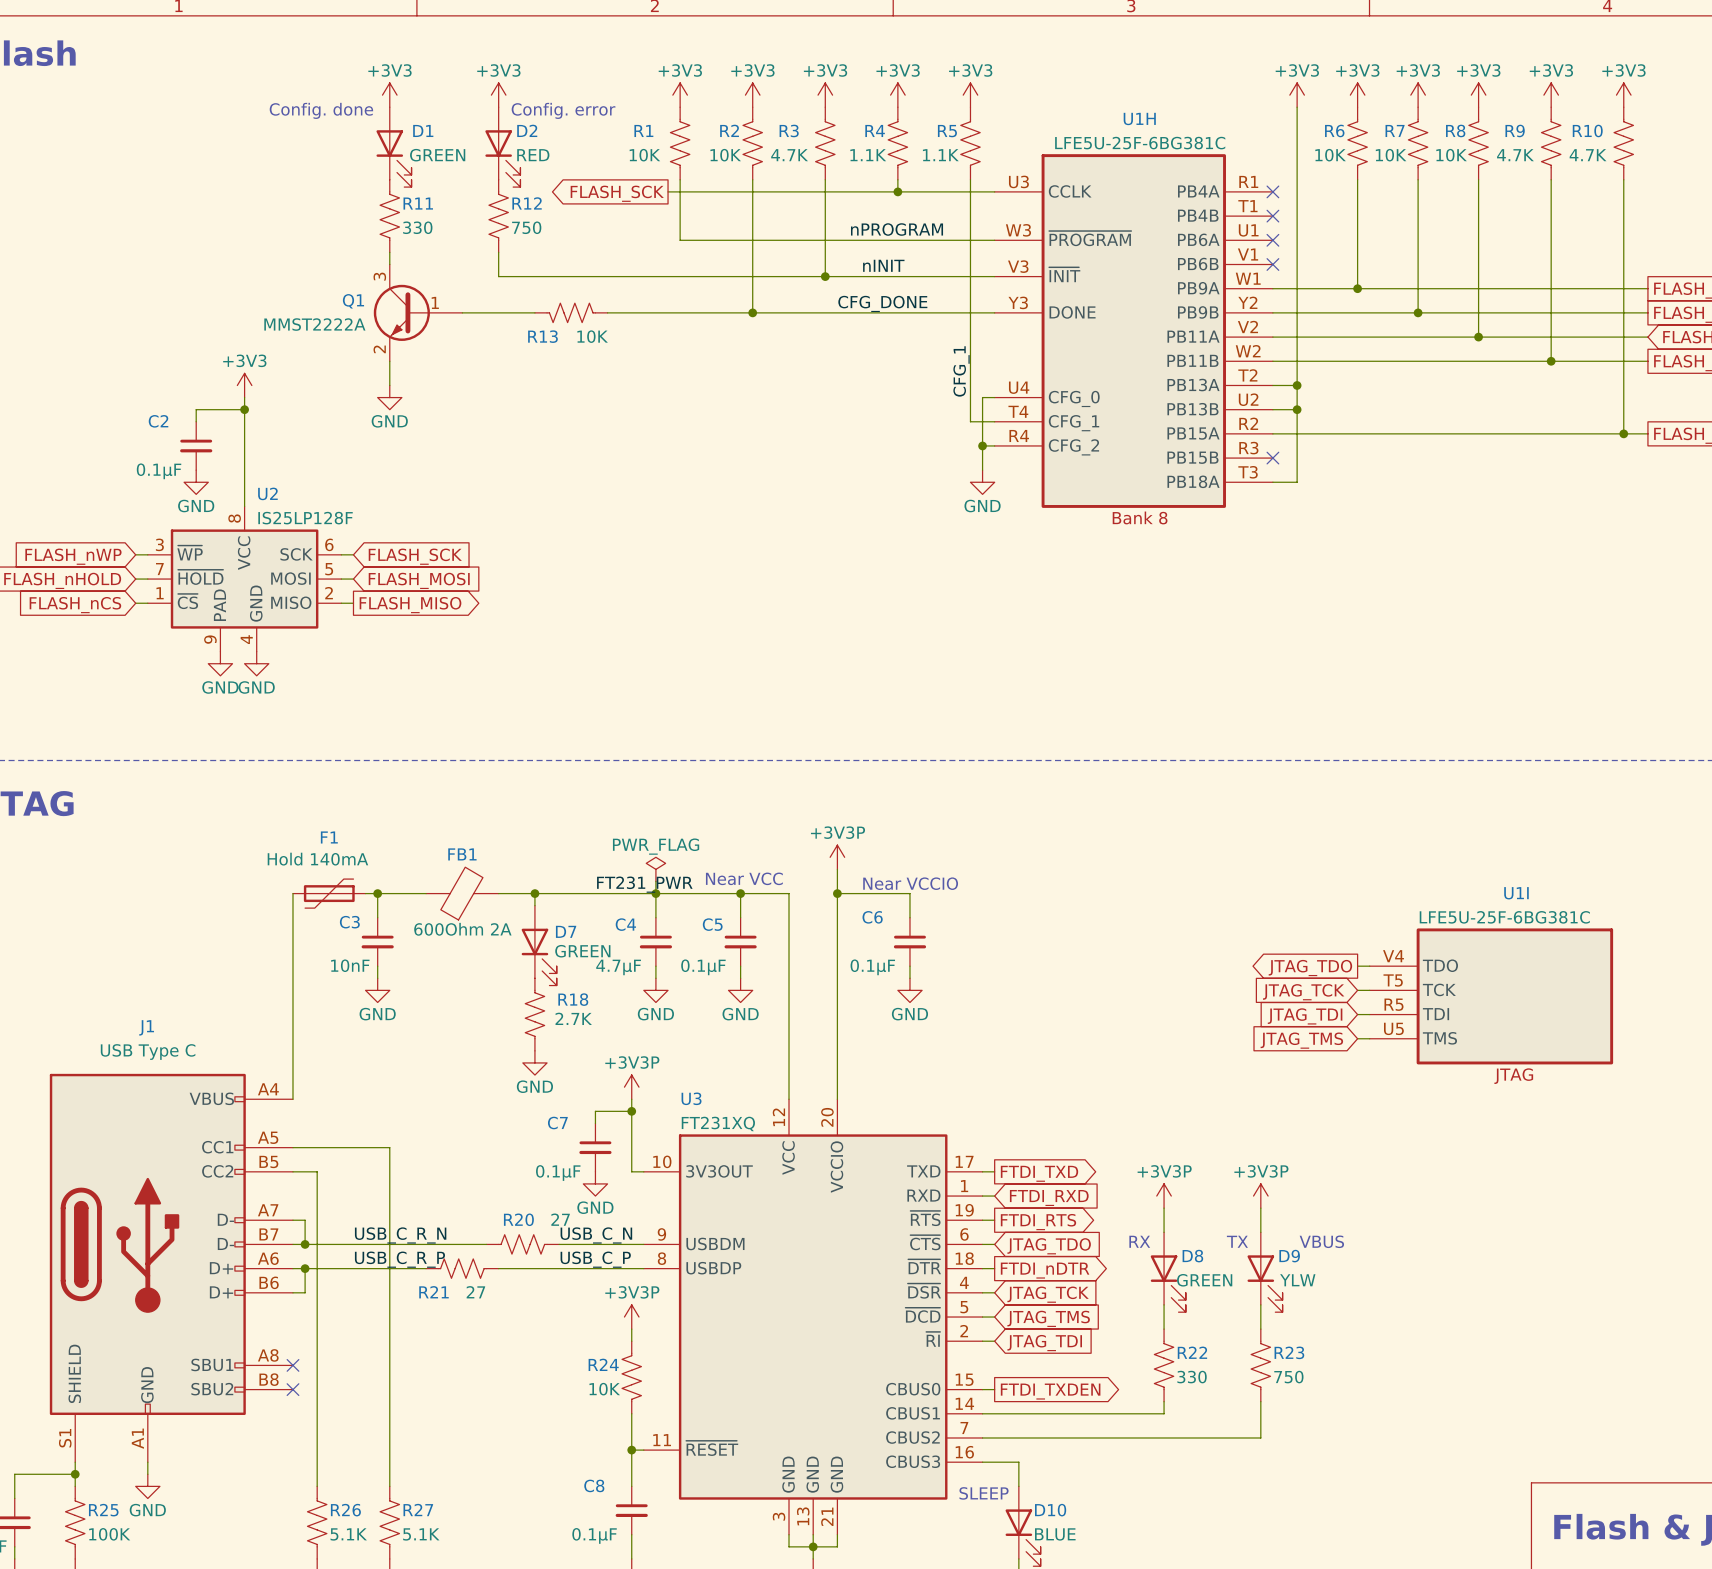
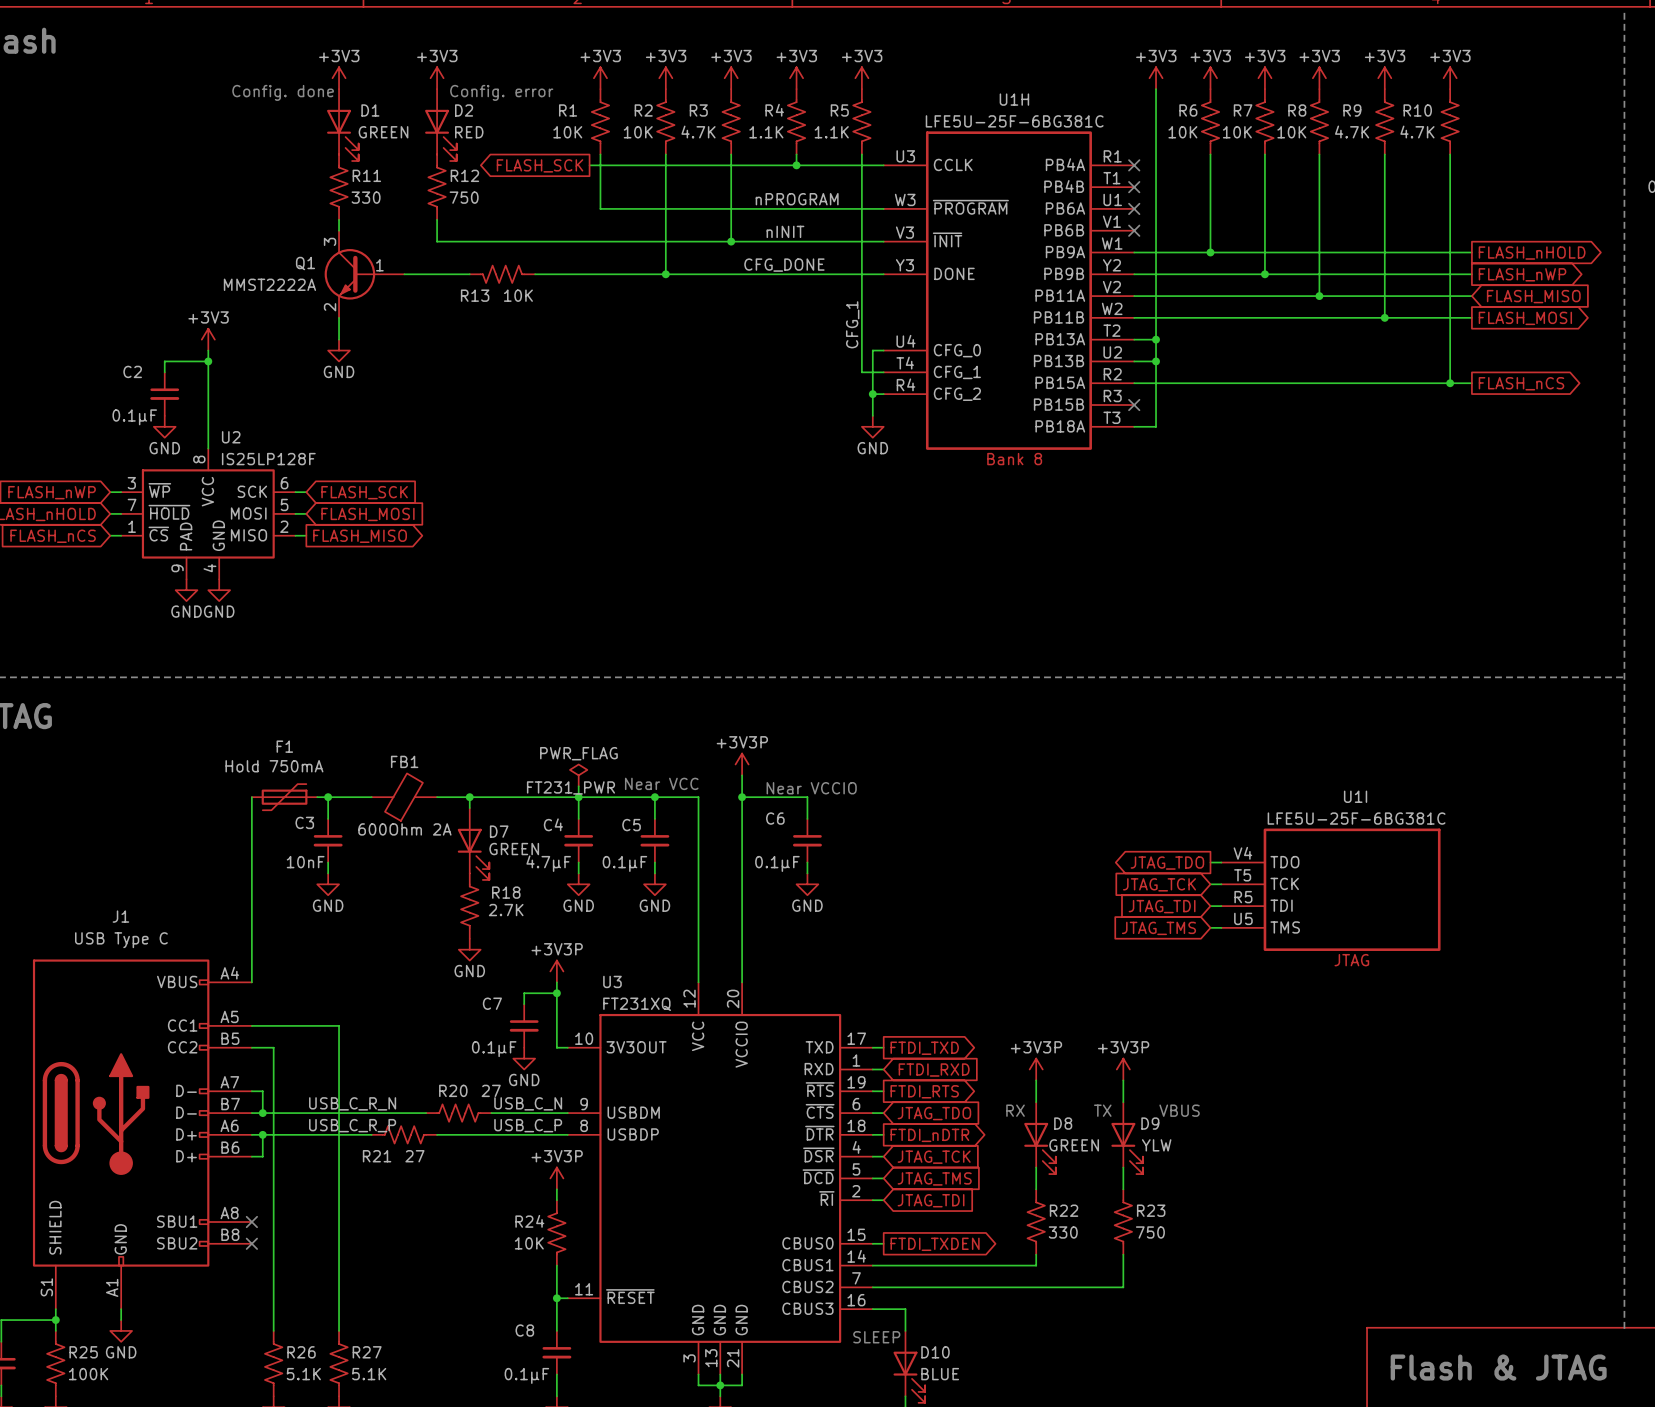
F1 value: Hold 140mA (317, 859) -> Hold 750mA (274, 766)

